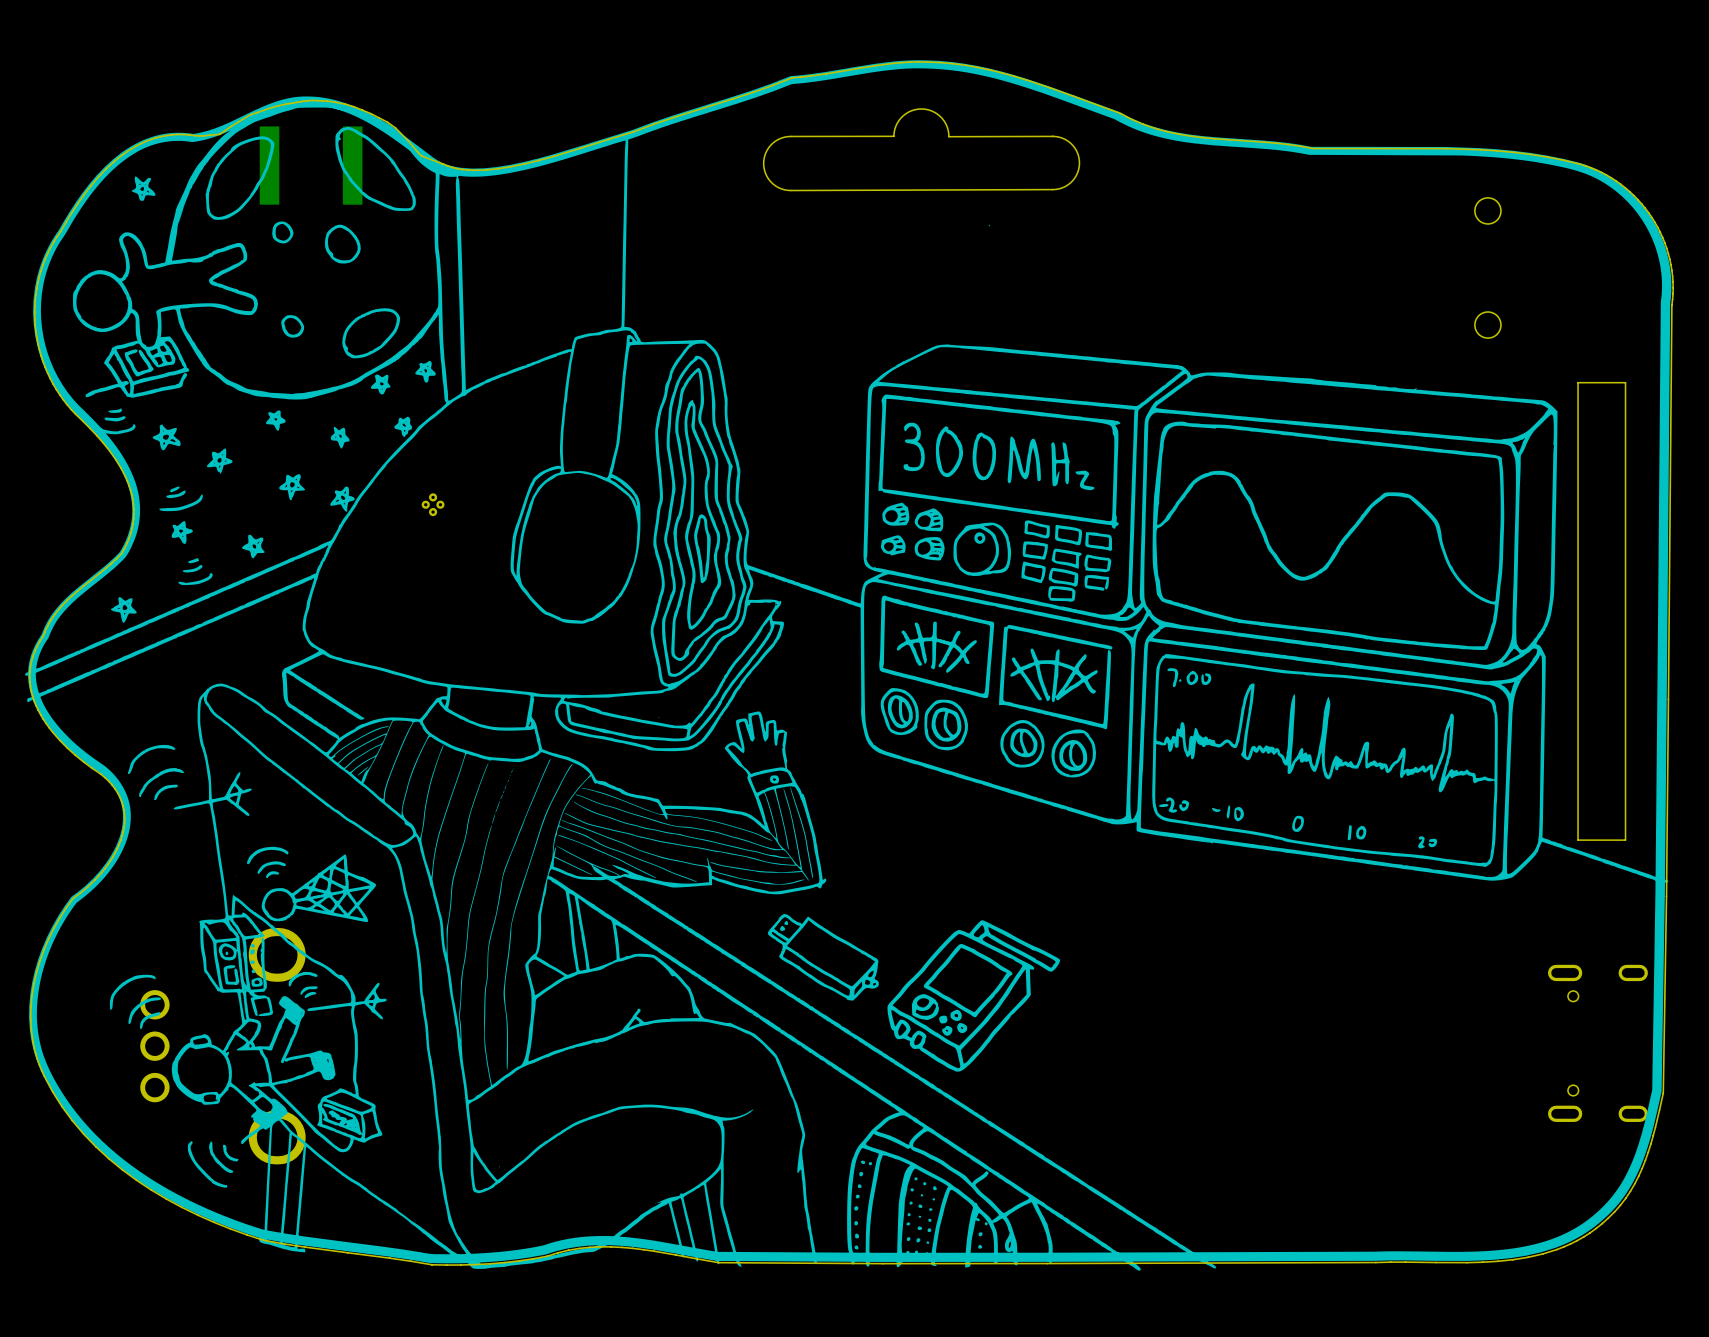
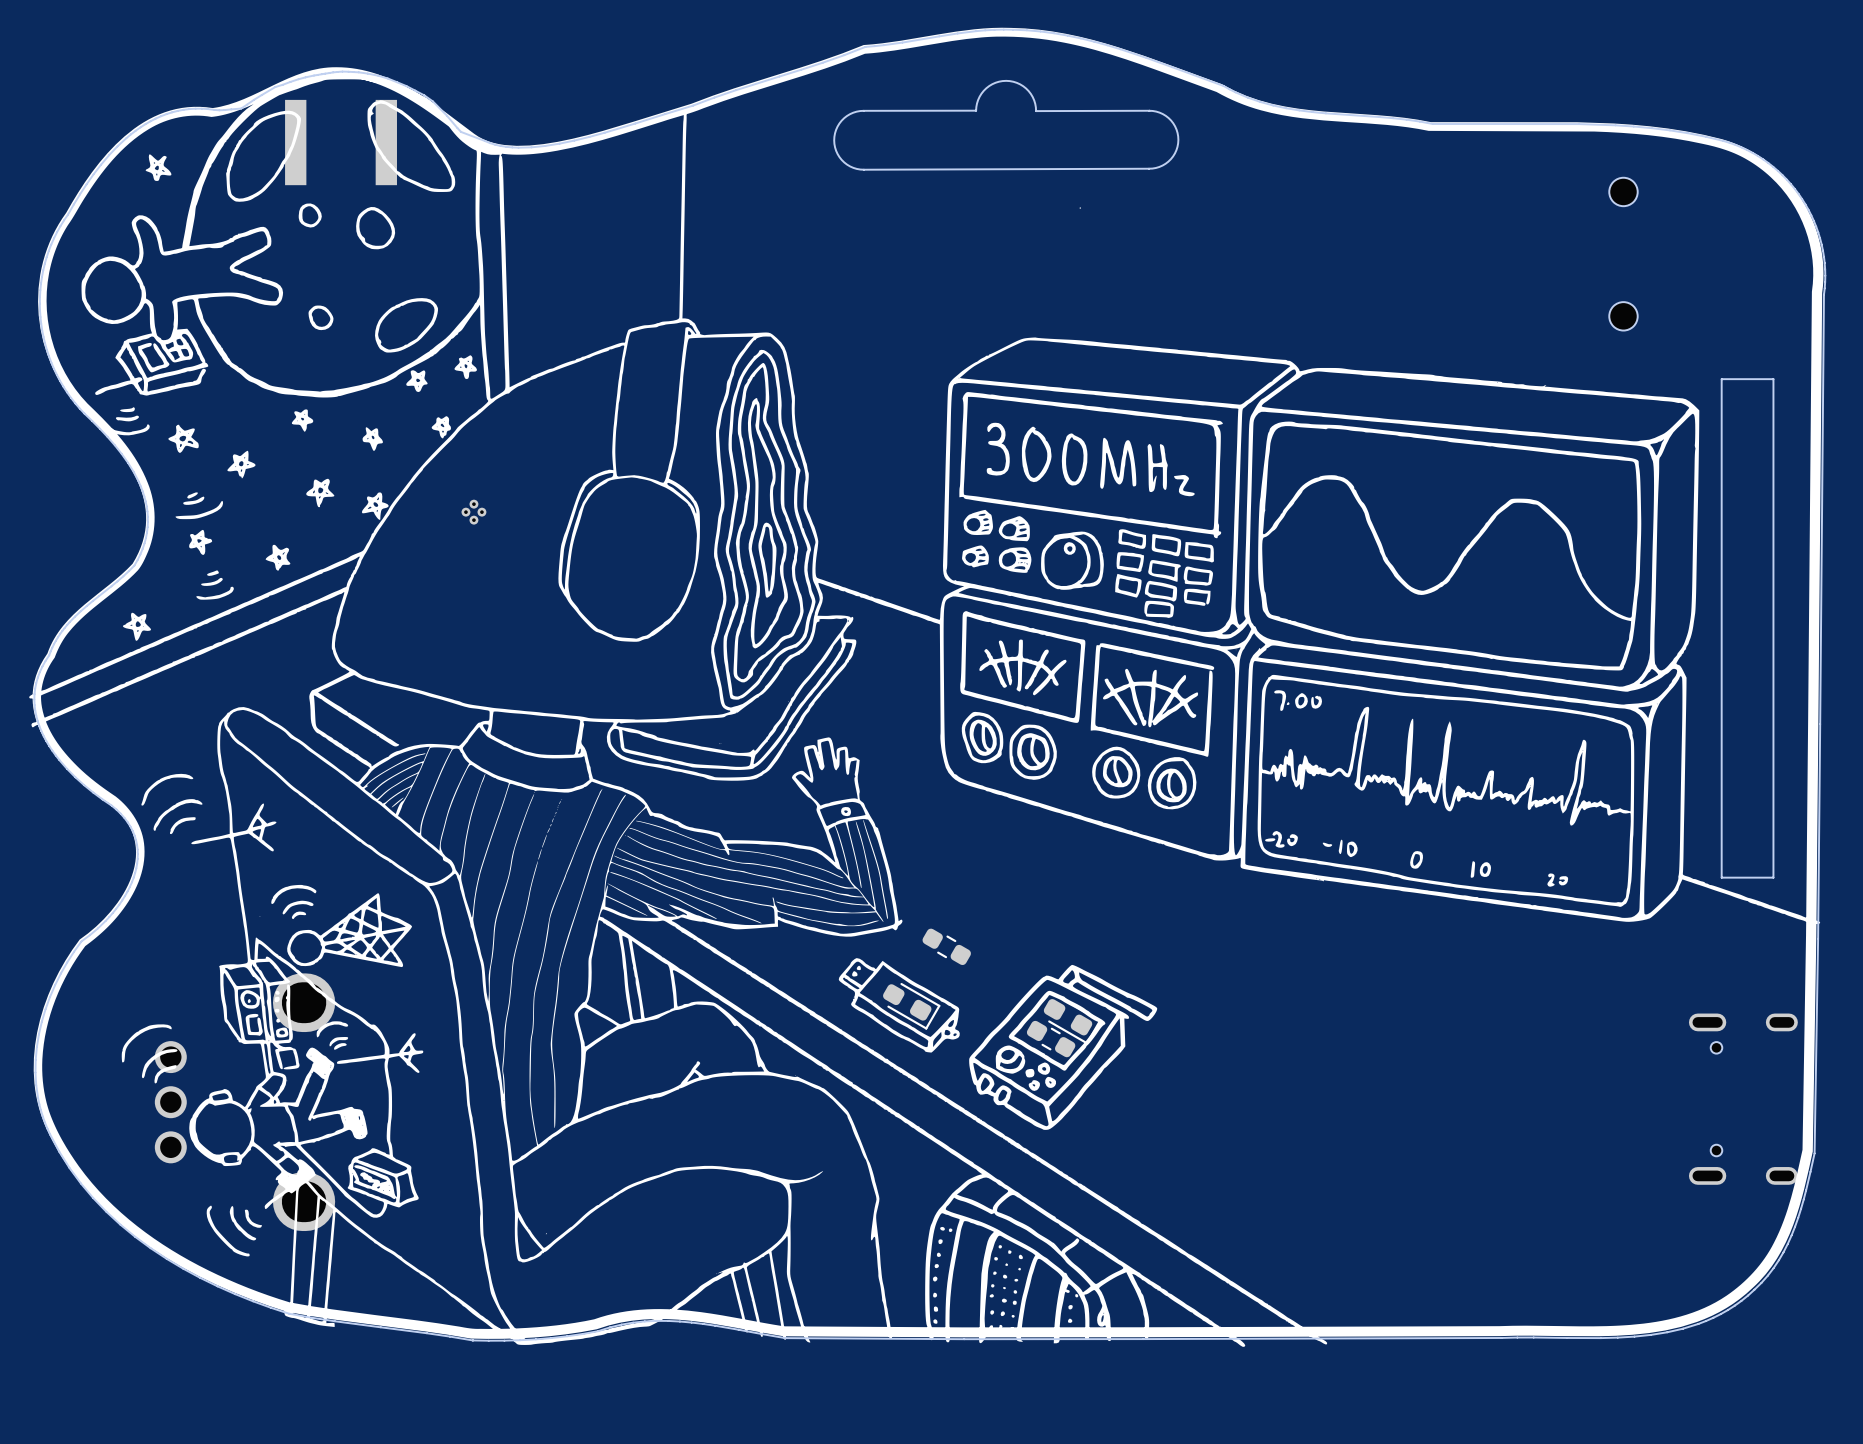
part: none -> (946, 946)
part: none -> (911, 1006)
part: none -> (1072, 1021)
part: none -> (1051, 1039)

